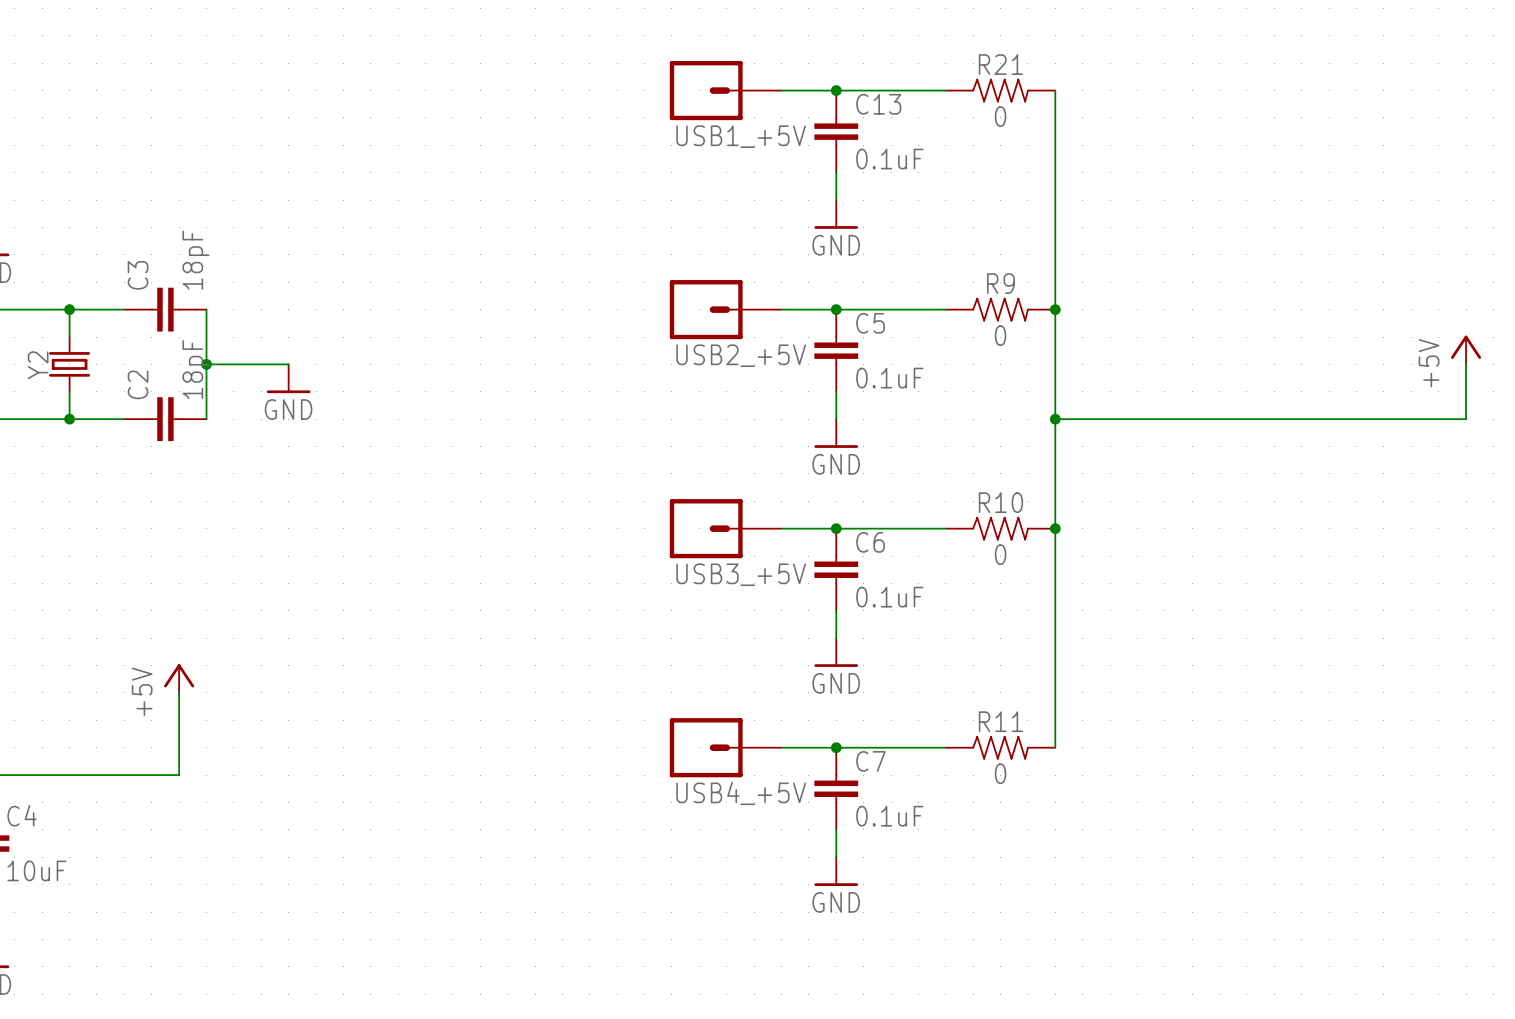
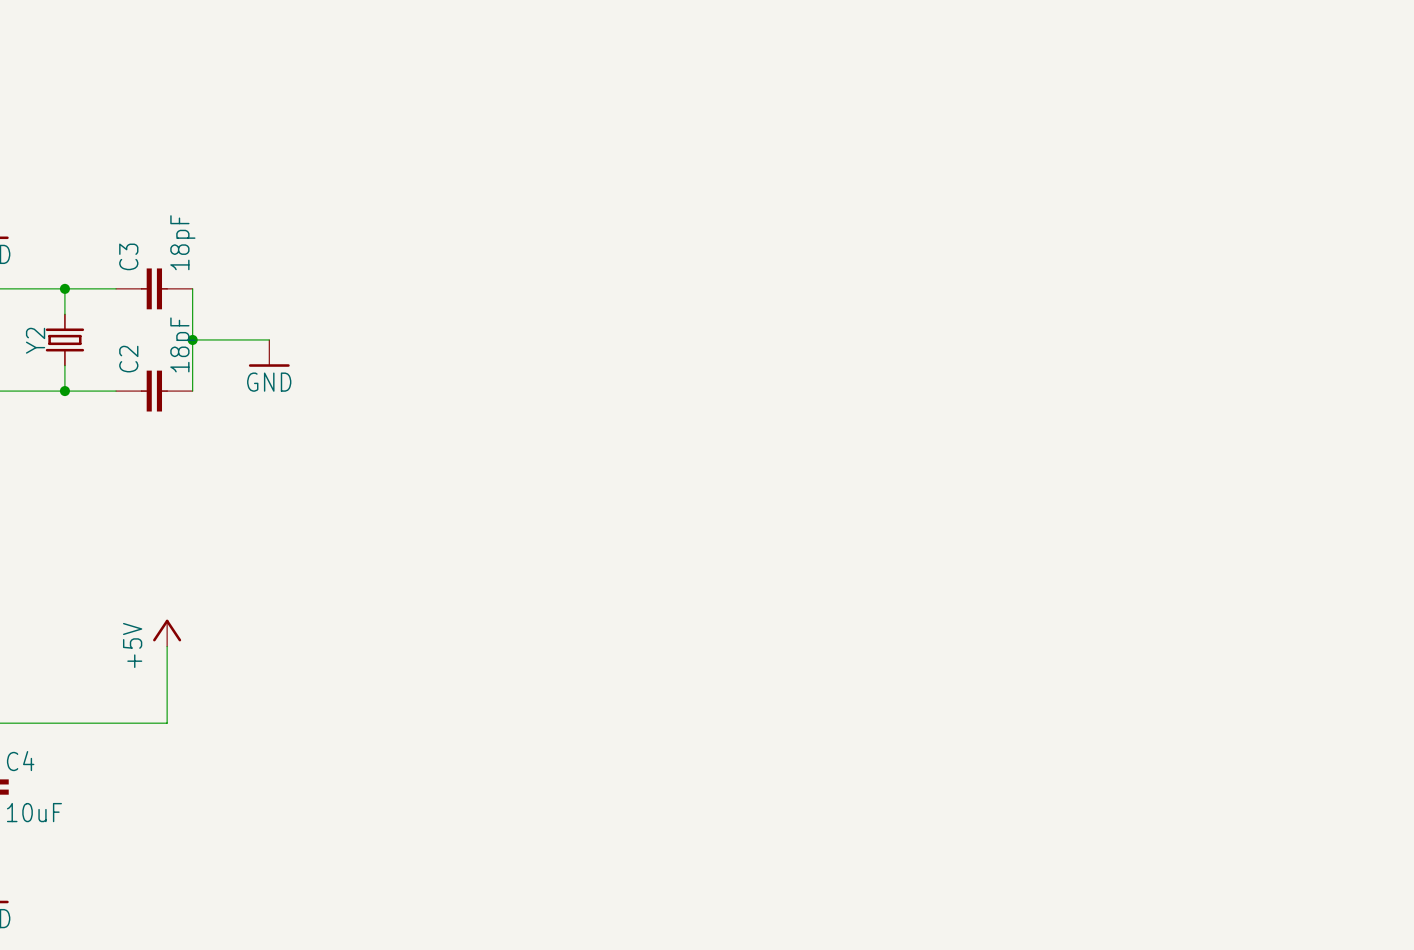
USB1_+5V: (725, 90) -> none
wire: (781, 90) (945, 90) -> none
junction: (836, 90) -> none
R21: 0 (1000, 90) -> none
wire: (1055, 90) (1055, 747) -> none
C13: 0.1uF (836, 131) -> none
wire: (836, 172) (836, 200) -> none
power symbol: GND (836, 214) -> none
USB2_+5V: (725, 309) -> none
wire: (781, 309) (945, 309) -> none
junction: (836, 309) -> none
R9: 0 (1000, 309) -> none
junction: (1055, 309) -> none
C5: 0.1uF (836, 350) -> none
power symbol: +5V (1466, 350) -> none
wire: (1466, 364) (1466, 419) (1055, 419) -> none
wire: (836, 391) (836, 419) -> none
junction: (1055, 419) -> none
power symbol: GND (836, 433) -> none
USB3_+5V: (725, 528) -> none
wire: (781, 528) (945, 528) -> none
junction: (836, 528) -> none
R10: 0 (1000, 528) -> none
junction: (1055, 528) -> none
C6: 0.1uF (836, 569) -> none
wire: (836, 610) (836, 638) -> none
power symbol: GND (836, 652) -> none
USB4_+5V: (725, 747) -> none
wire: (781, 747) (945, 747) -> none
junction: (836, 747) -> none
R11: 0 (1000, 747) -> none
C7: 0.1uF (836, 788) -> none
wire: (836, 829) (836, 857) -> none
power symbol: GND (836, 871) -> none

